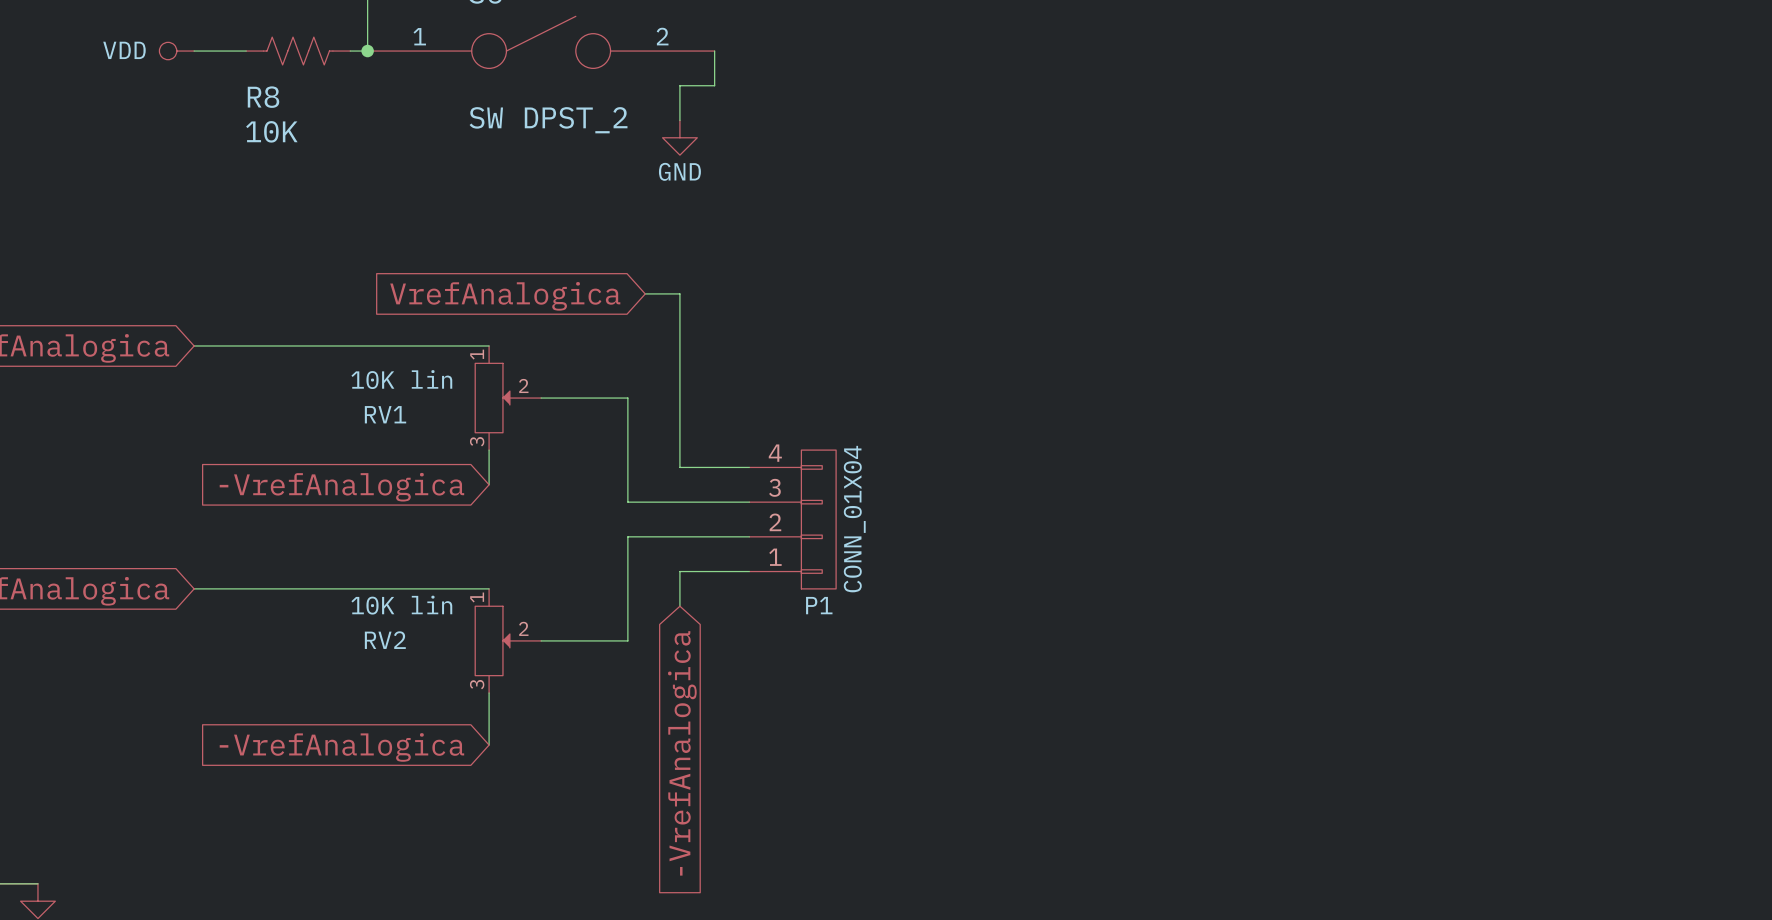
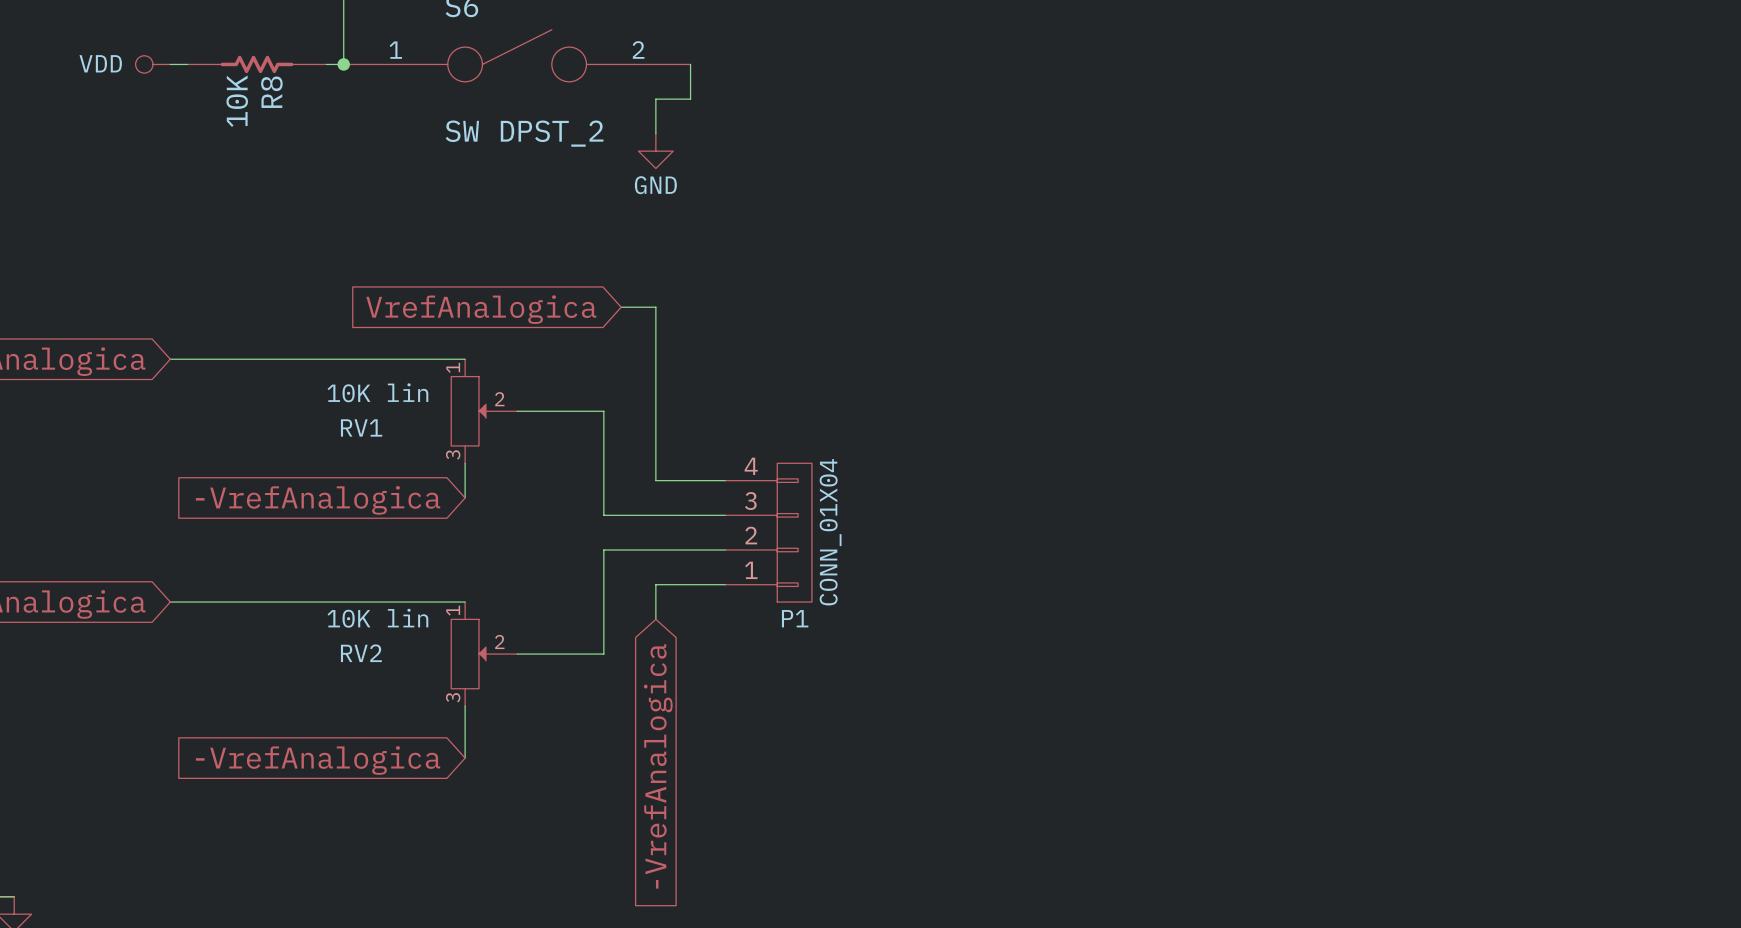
R8 symbol: [246, 37, 351, 65] -> [187, 55, 327, 74]
R8 name position: R8 (263, 97) -> R8 (271, 92)
R8 value position: 10K (271, 131) -> 10K (237, 101)

